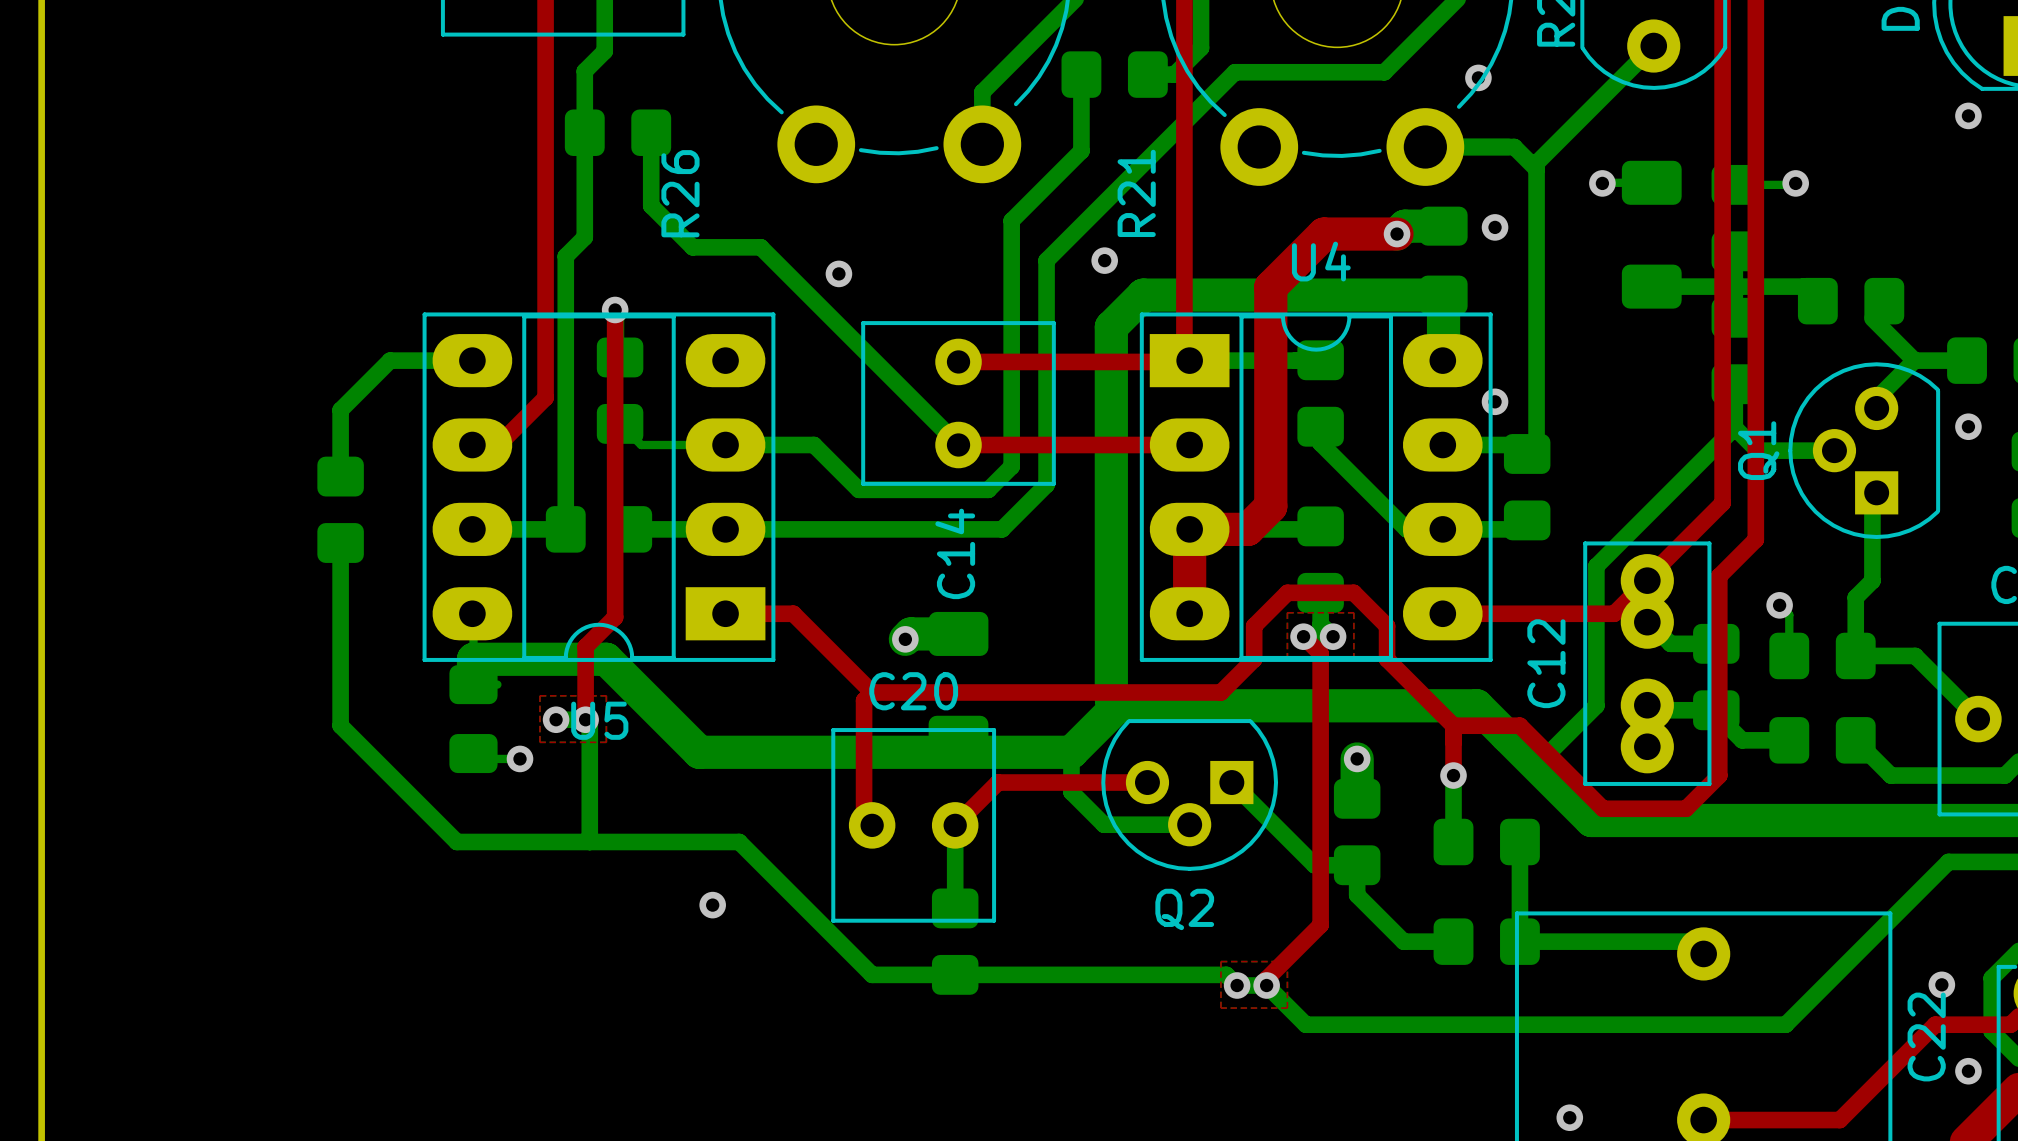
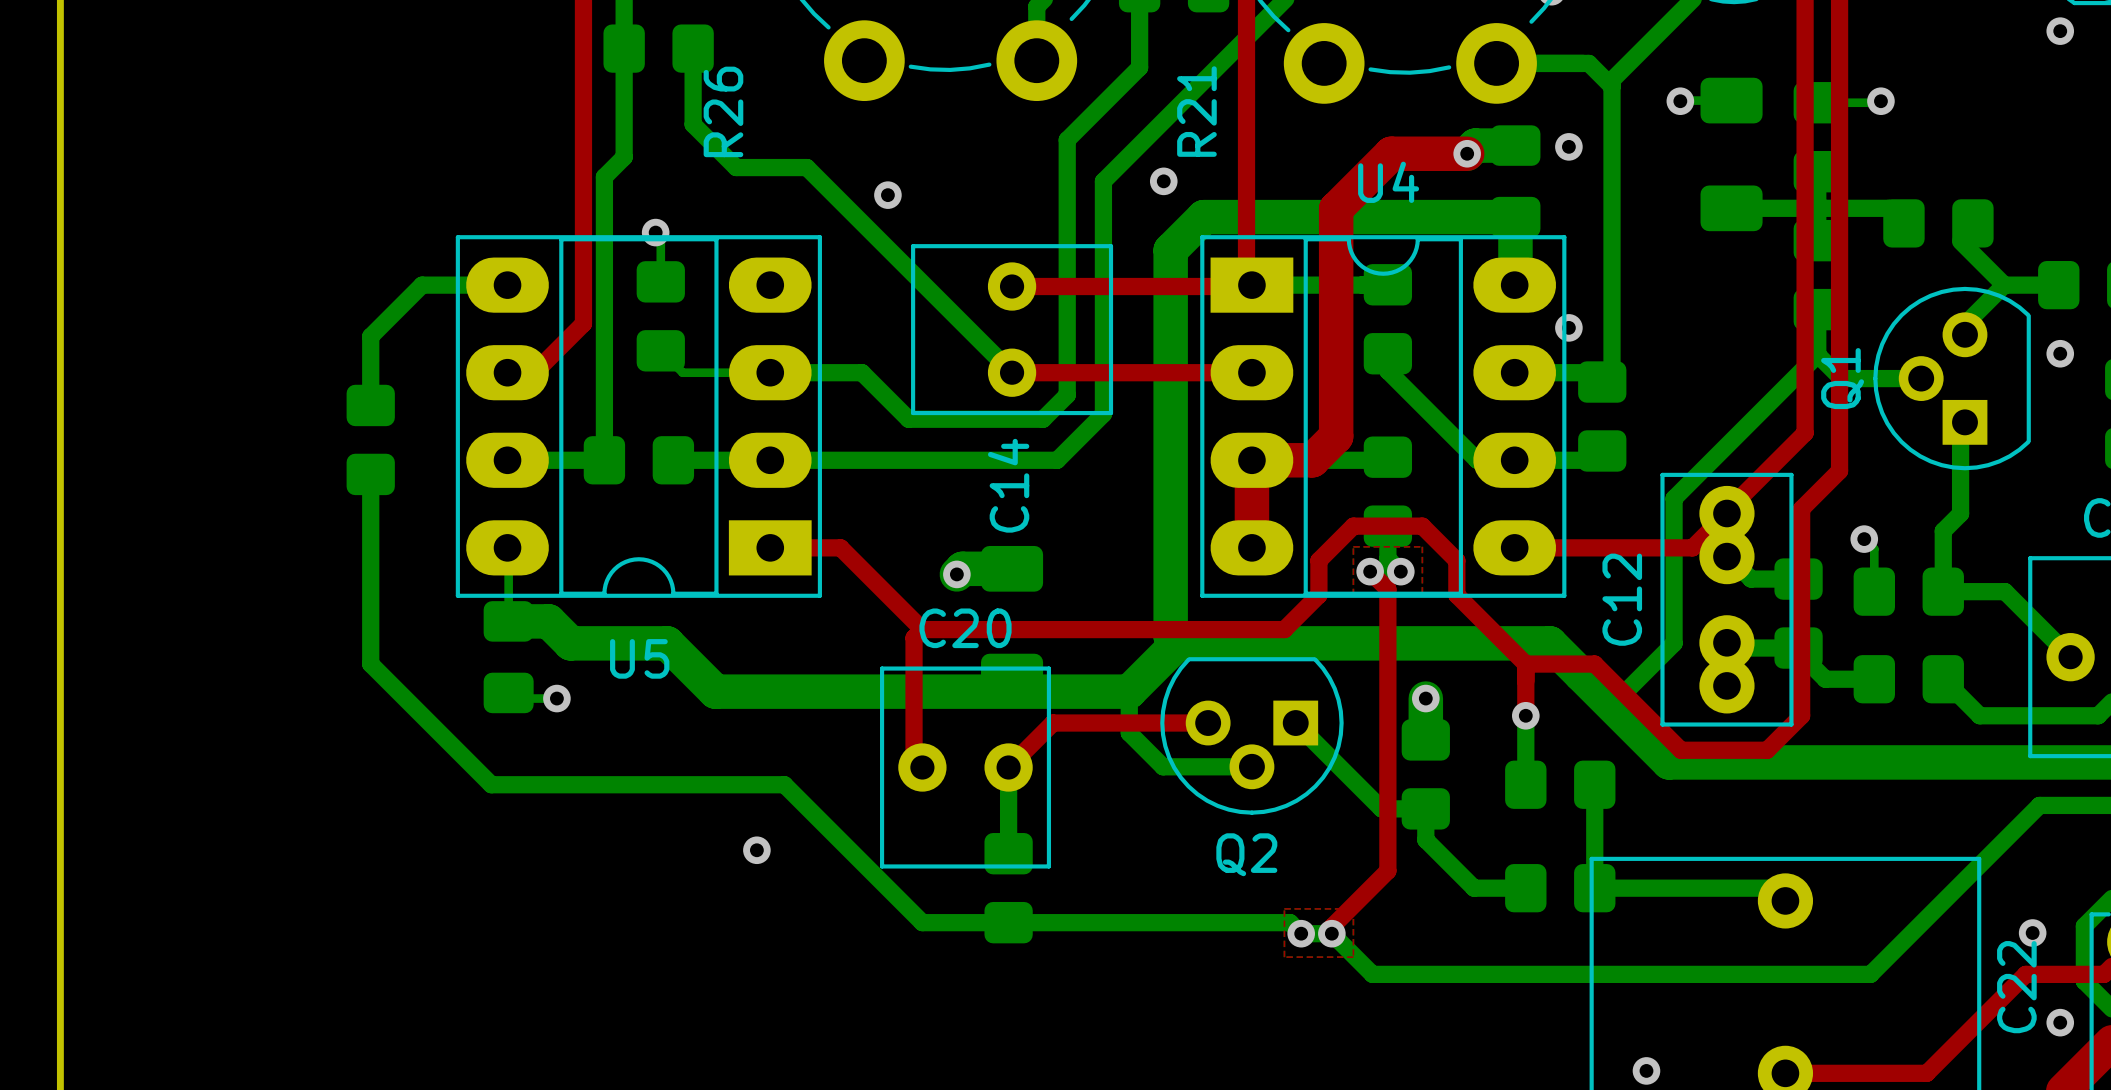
top track: (615, 309) (615, 617) (585, 646) (585, 719) -> none
bottom track: (473, 684) (473, 659) (606, 659) (699, 752) -> (508, 621) (548, 621) (570, 643) (667, 643) (715, 691) (743, 691)
top zone outline: (539, 695) (539, 742) (606, 742) (606, 695) (539, 695) -> none
bottom track: (556, 719) (585, 719) (589, 723) (589, 841) -> none
via: (556, 719) -> none
via: (585, 719) -> none

